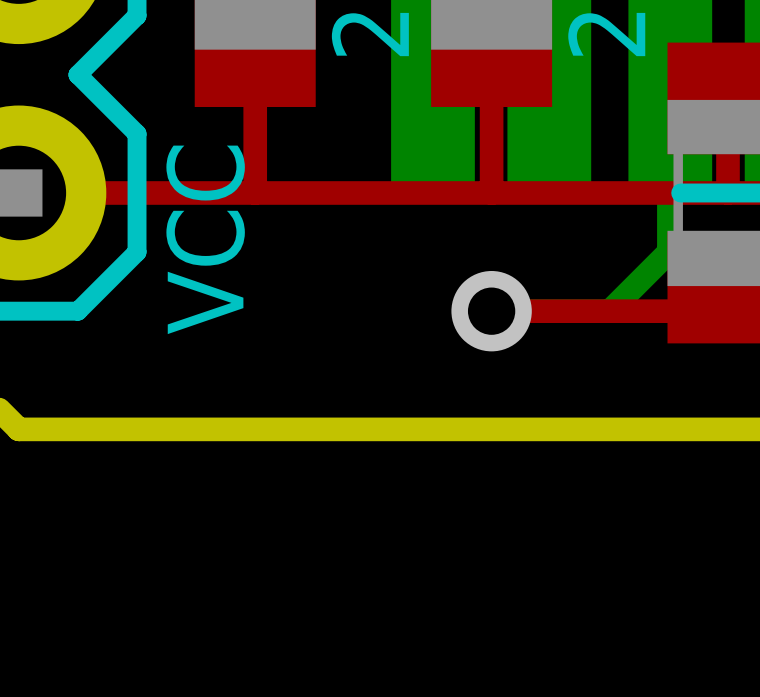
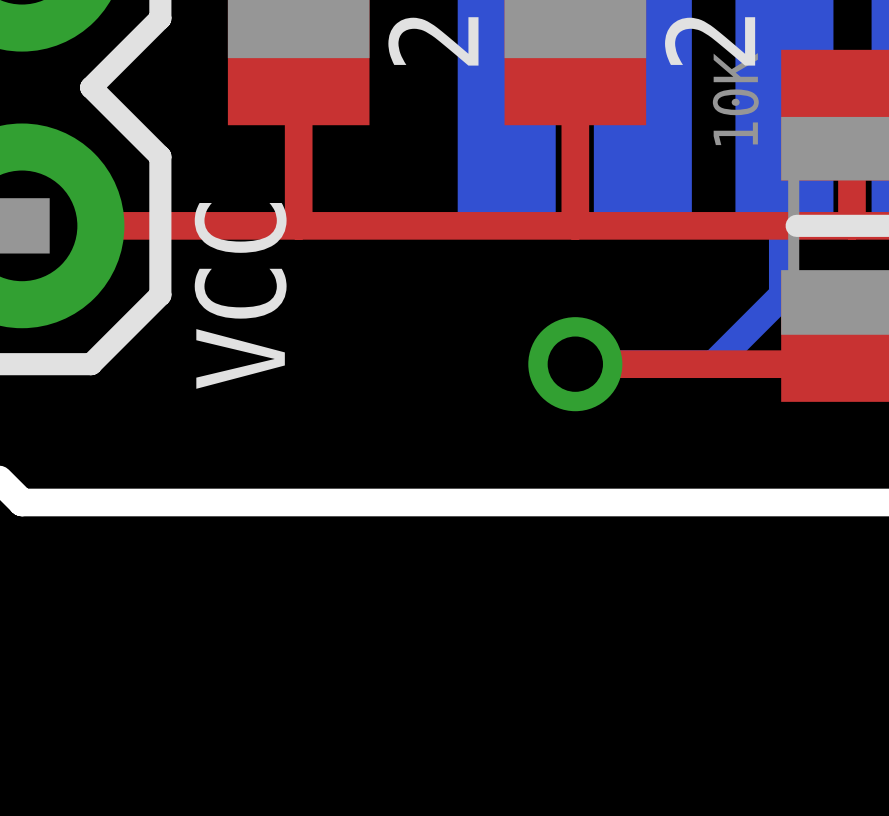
part value: none -> 10K (735, 99)

